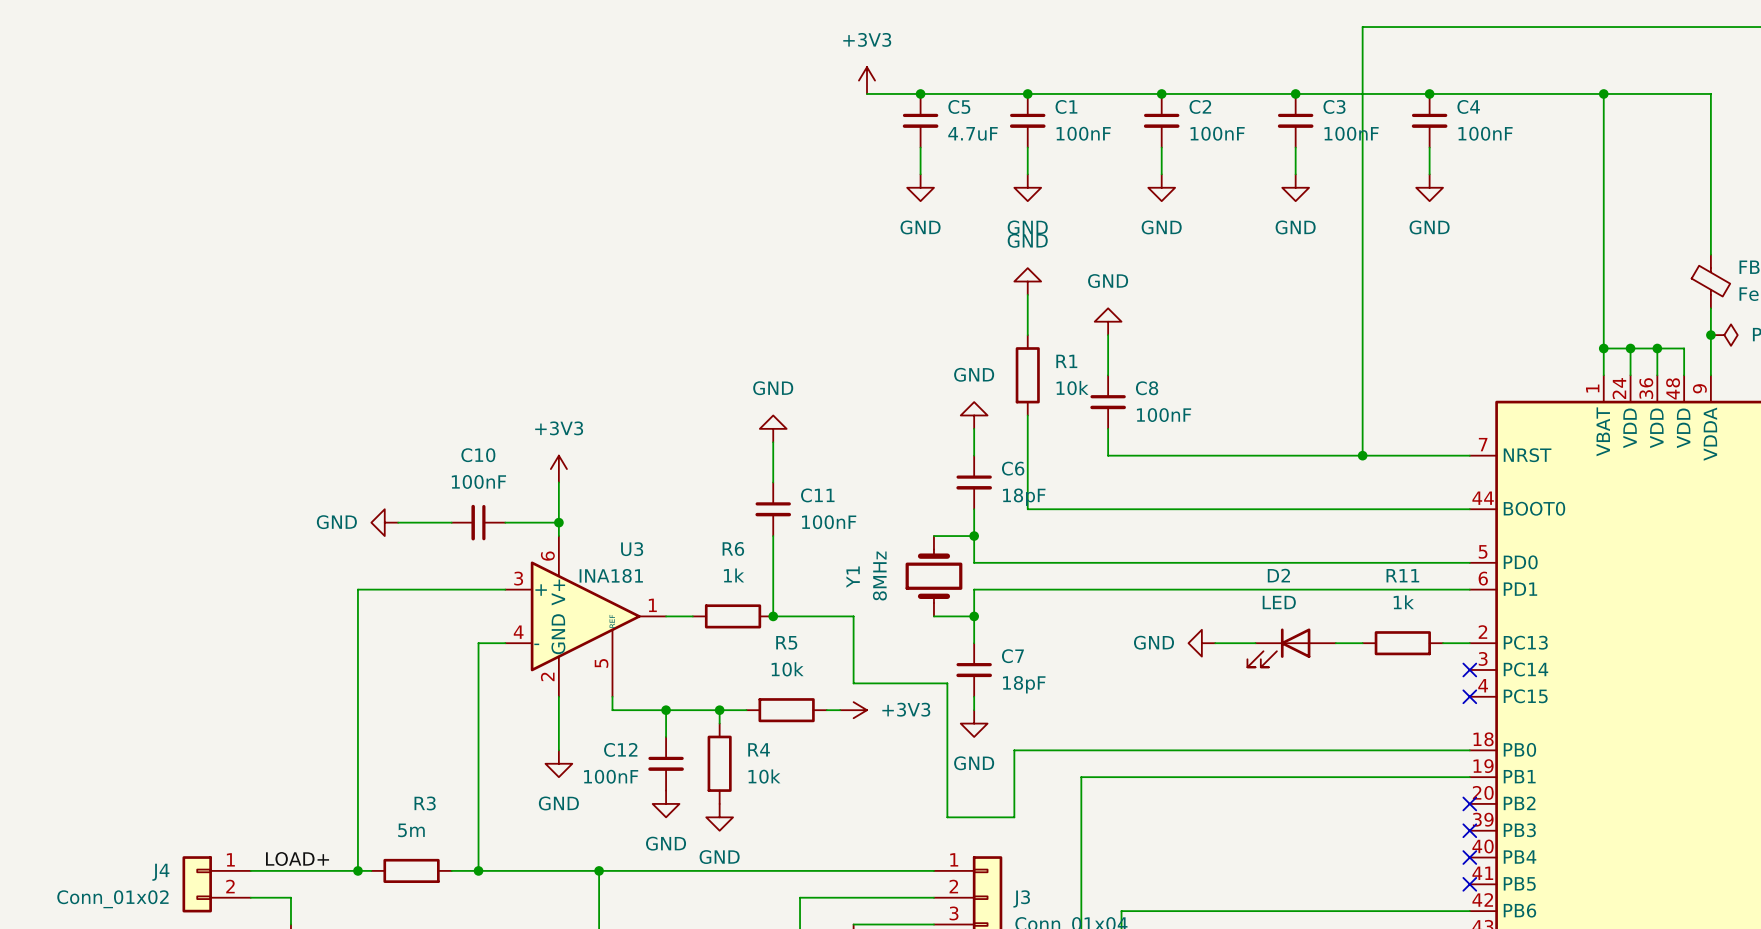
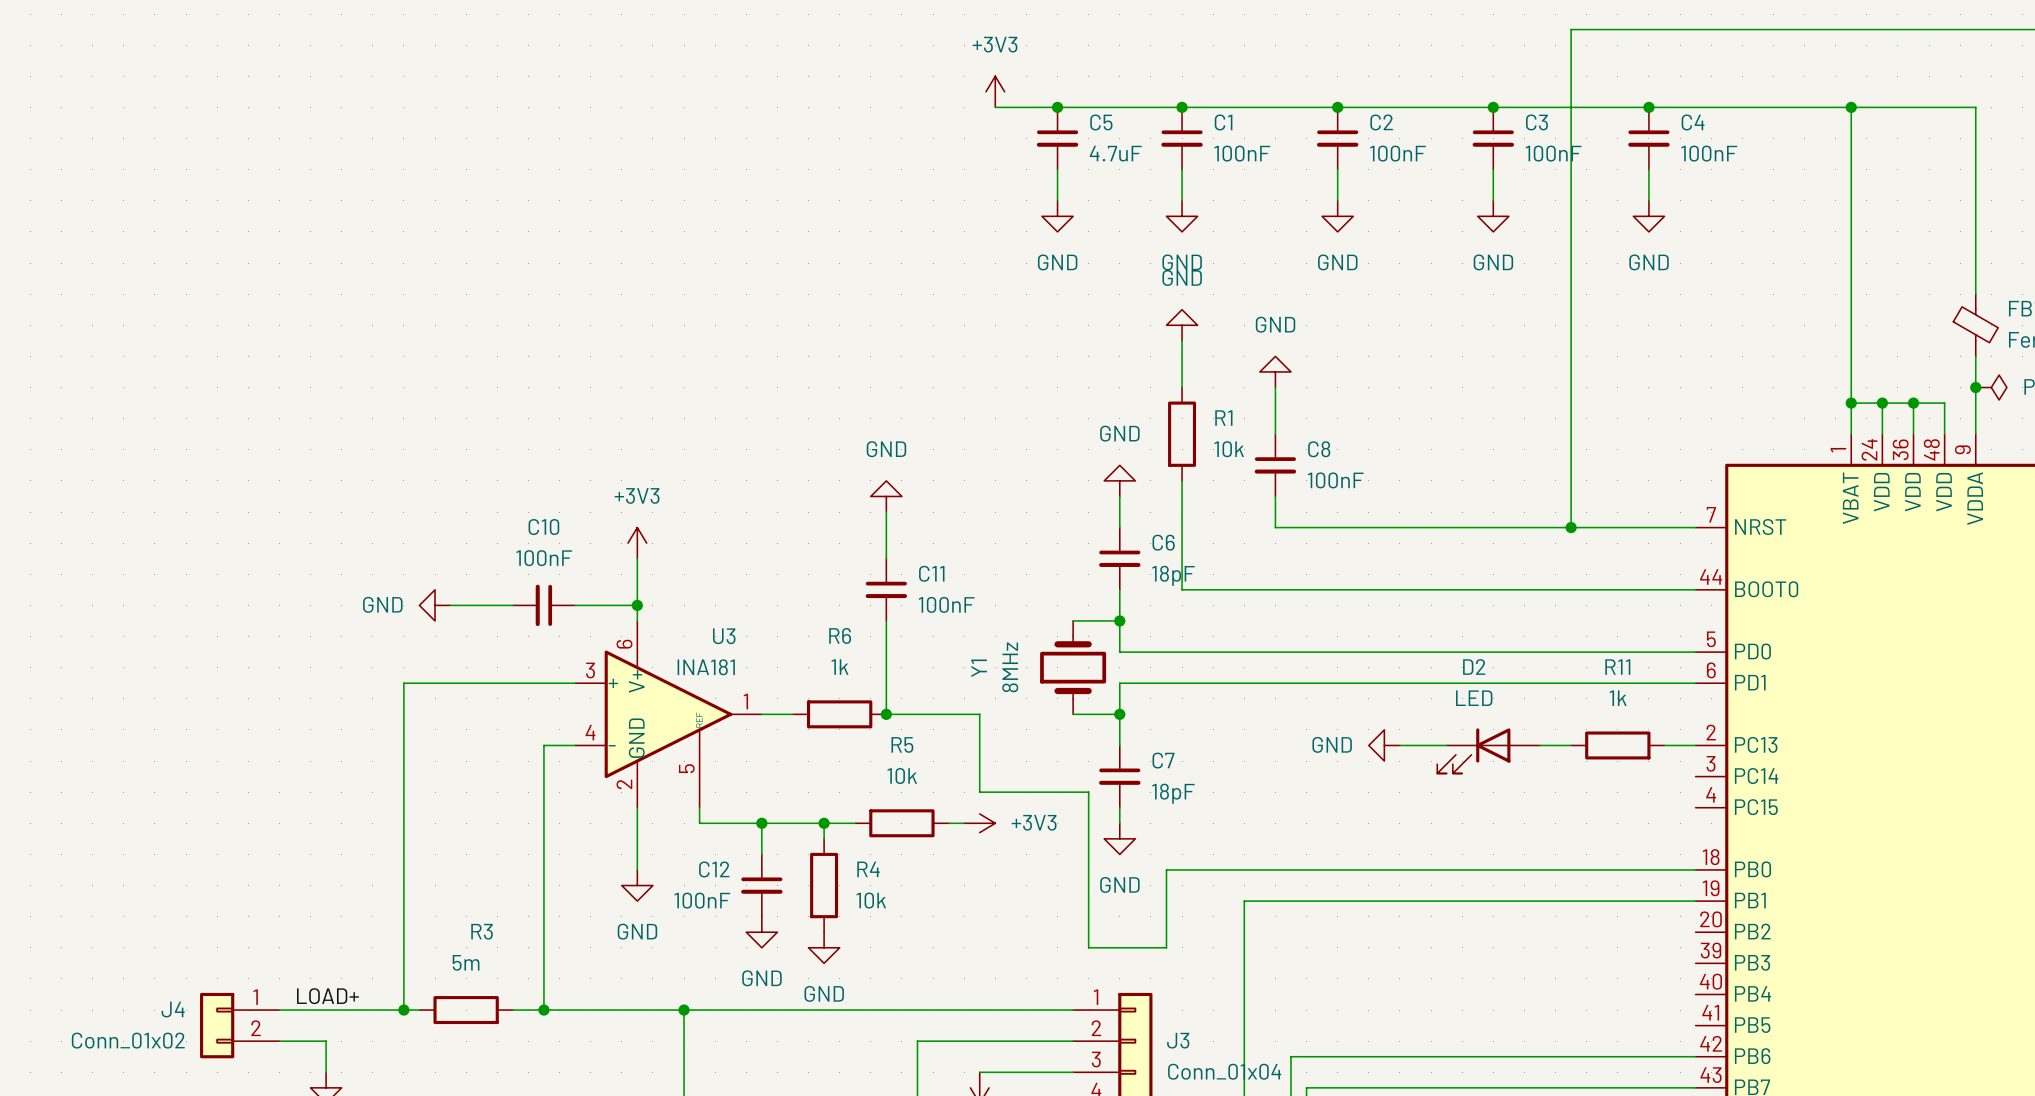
no-connect mark: (1469, 669) -> none
no-connect mark: (1469, 696) -> none
no-connect mark: (1469, 803) -> none
no-connect mark: (1469, 830) -> none
no-connect mark: (1469, 857) -> none
no-connect mark: (1469, 884) -> none

